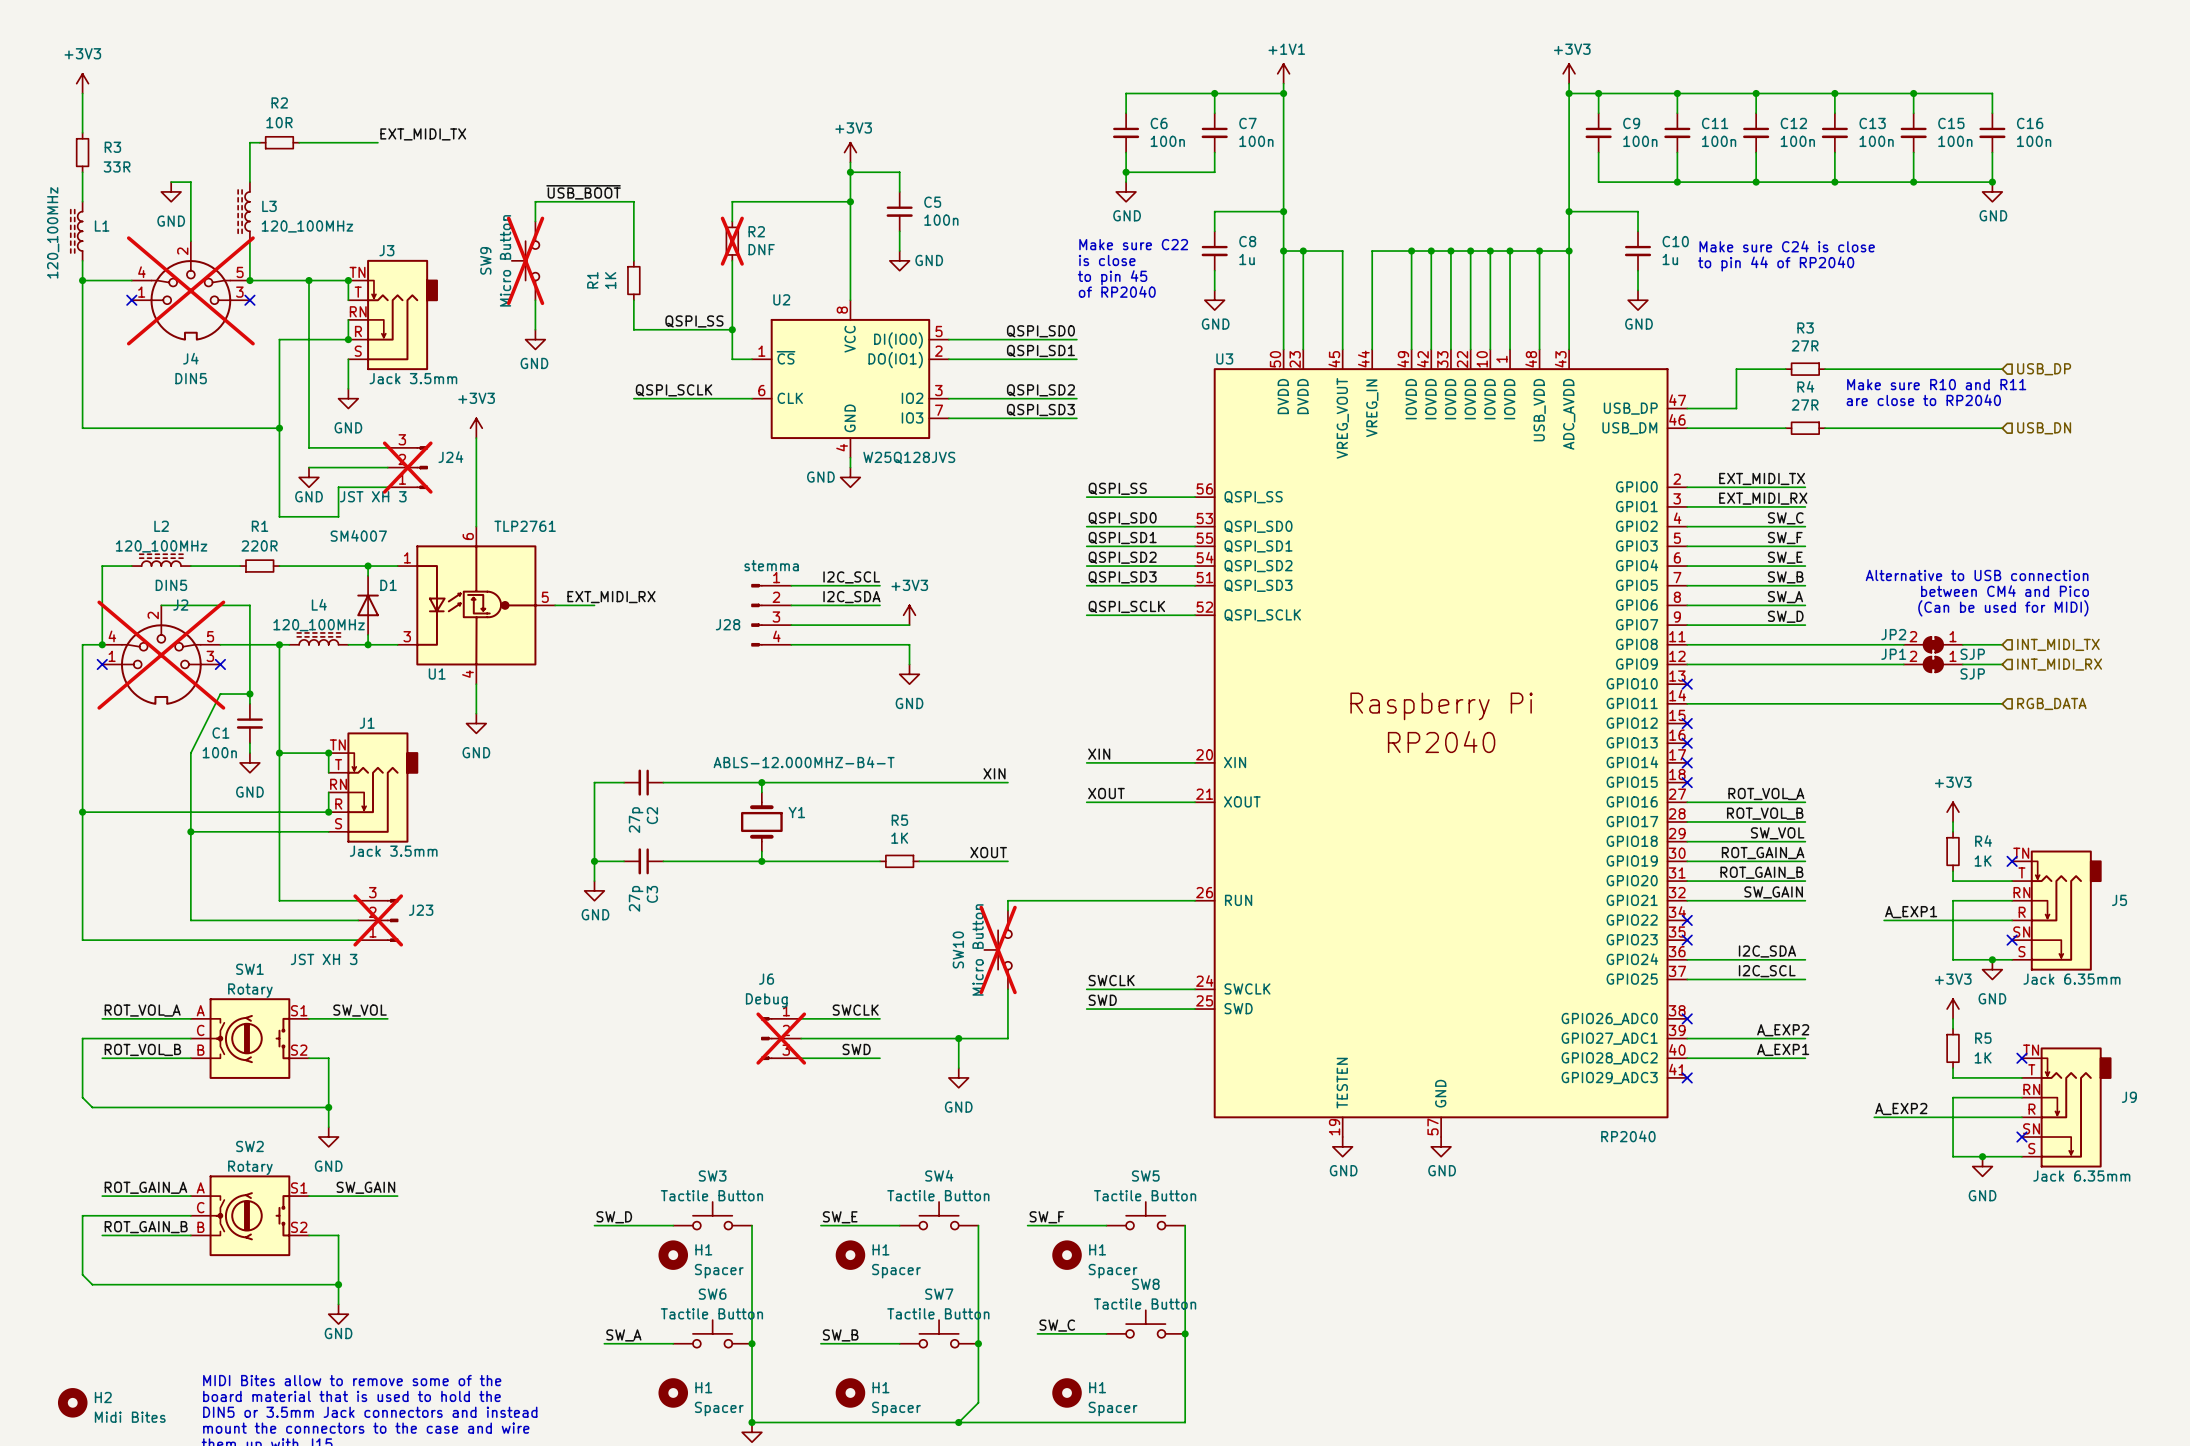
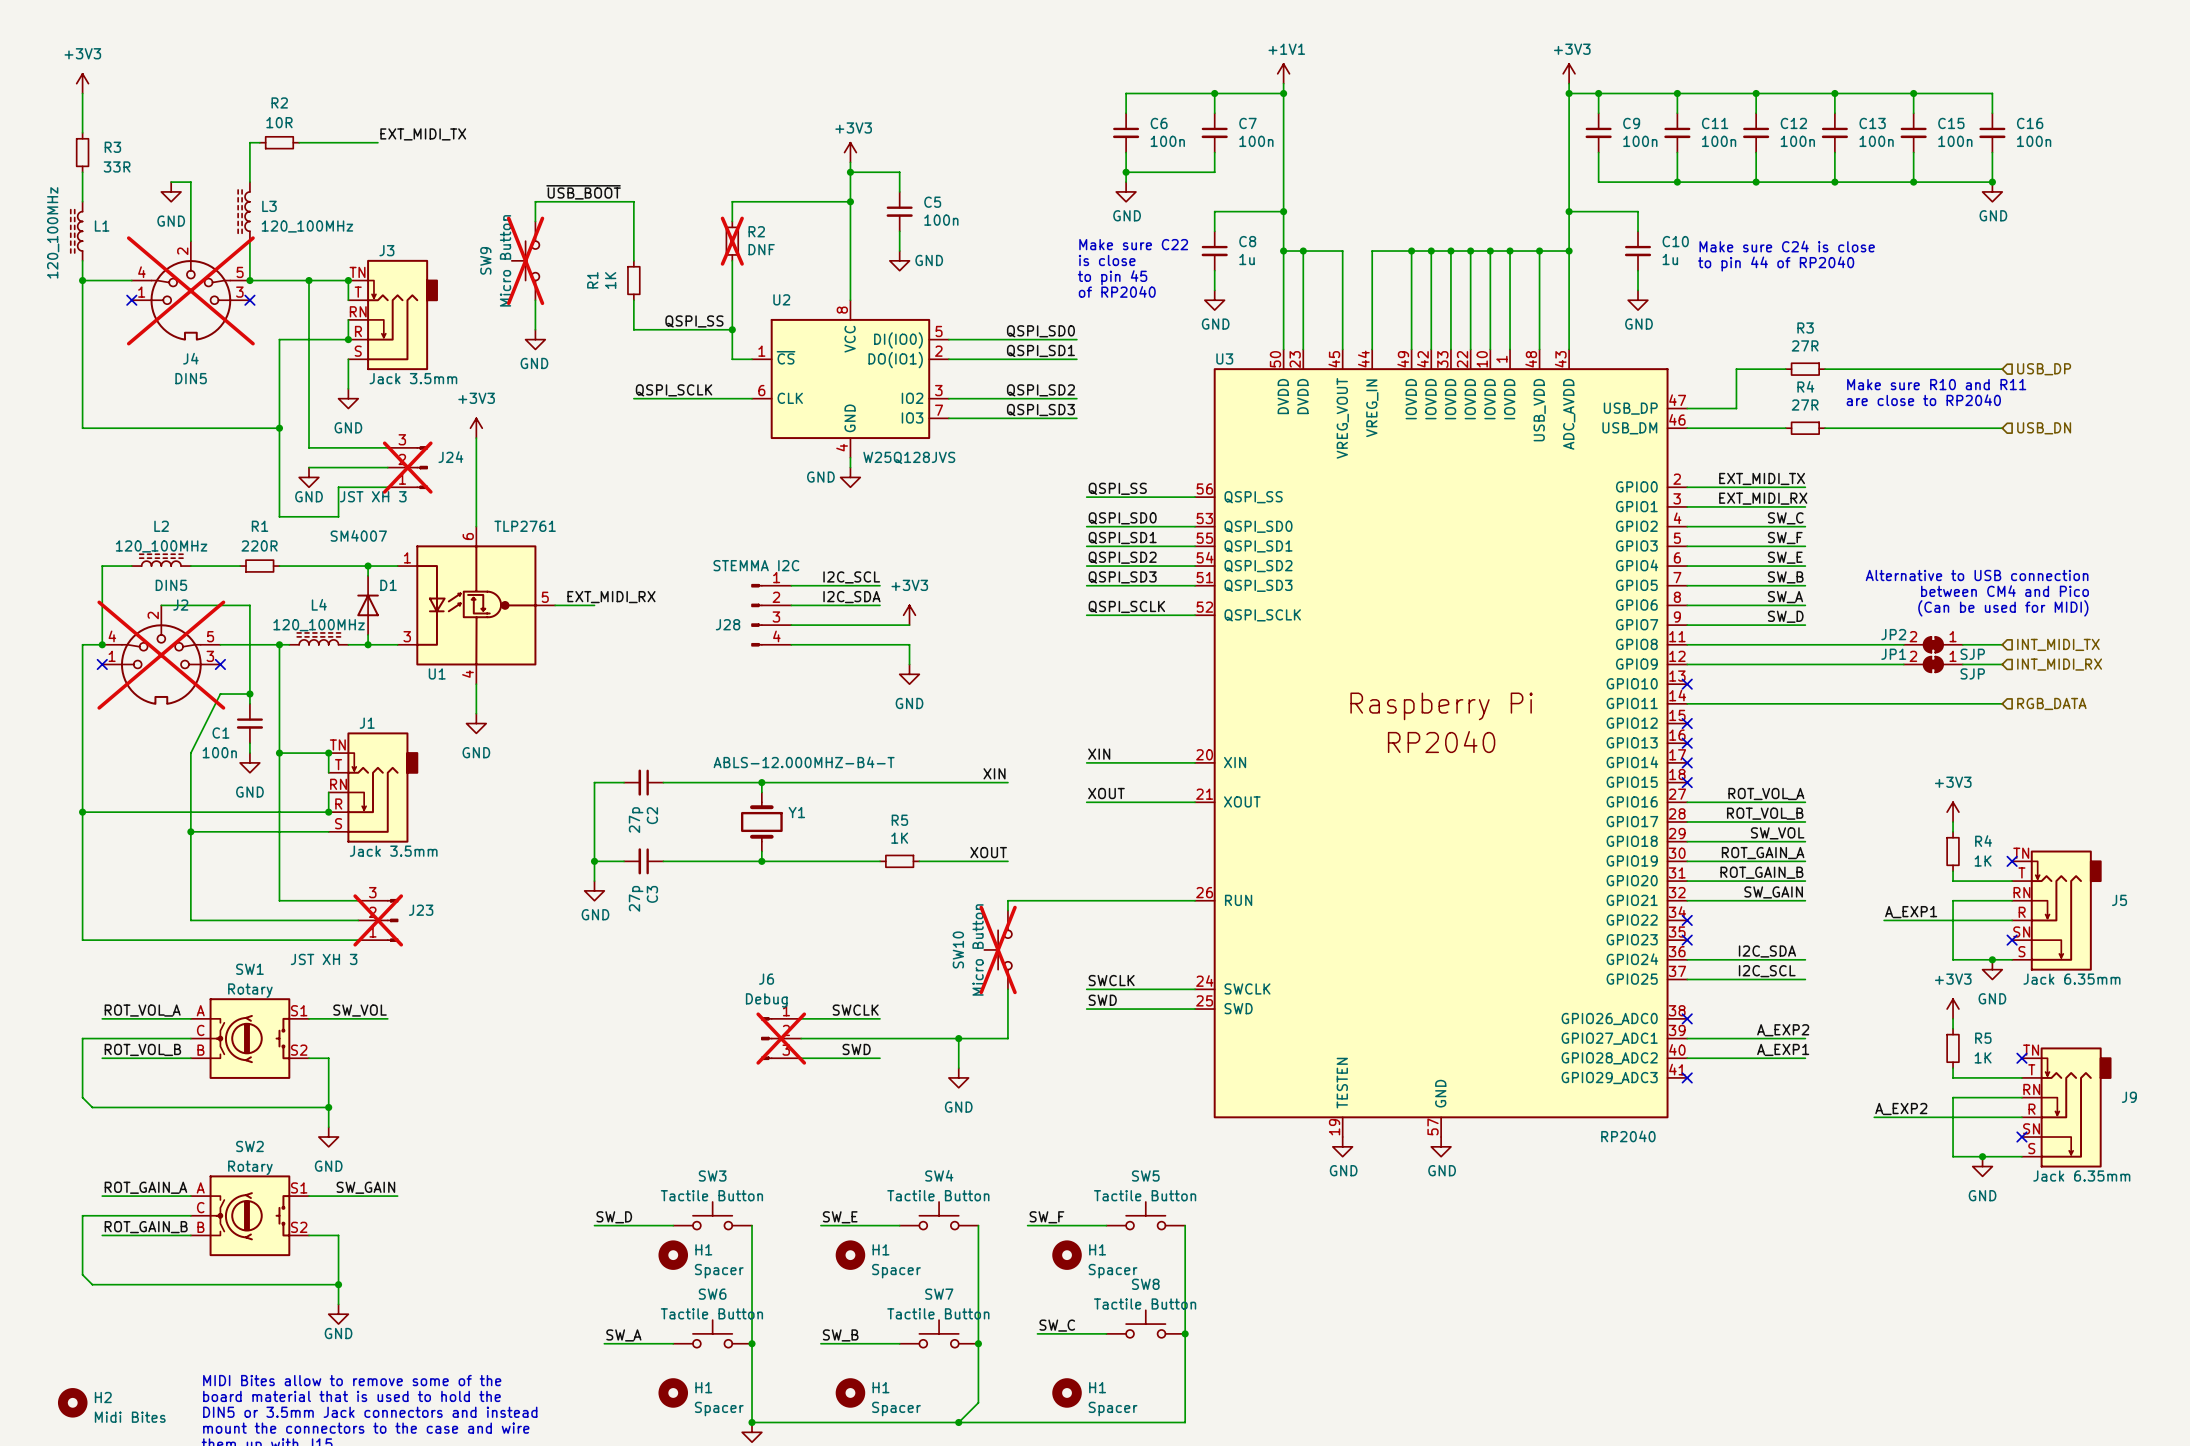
J28 value: stemma (771, 565) -> STEMMA I2C (756, 565)

